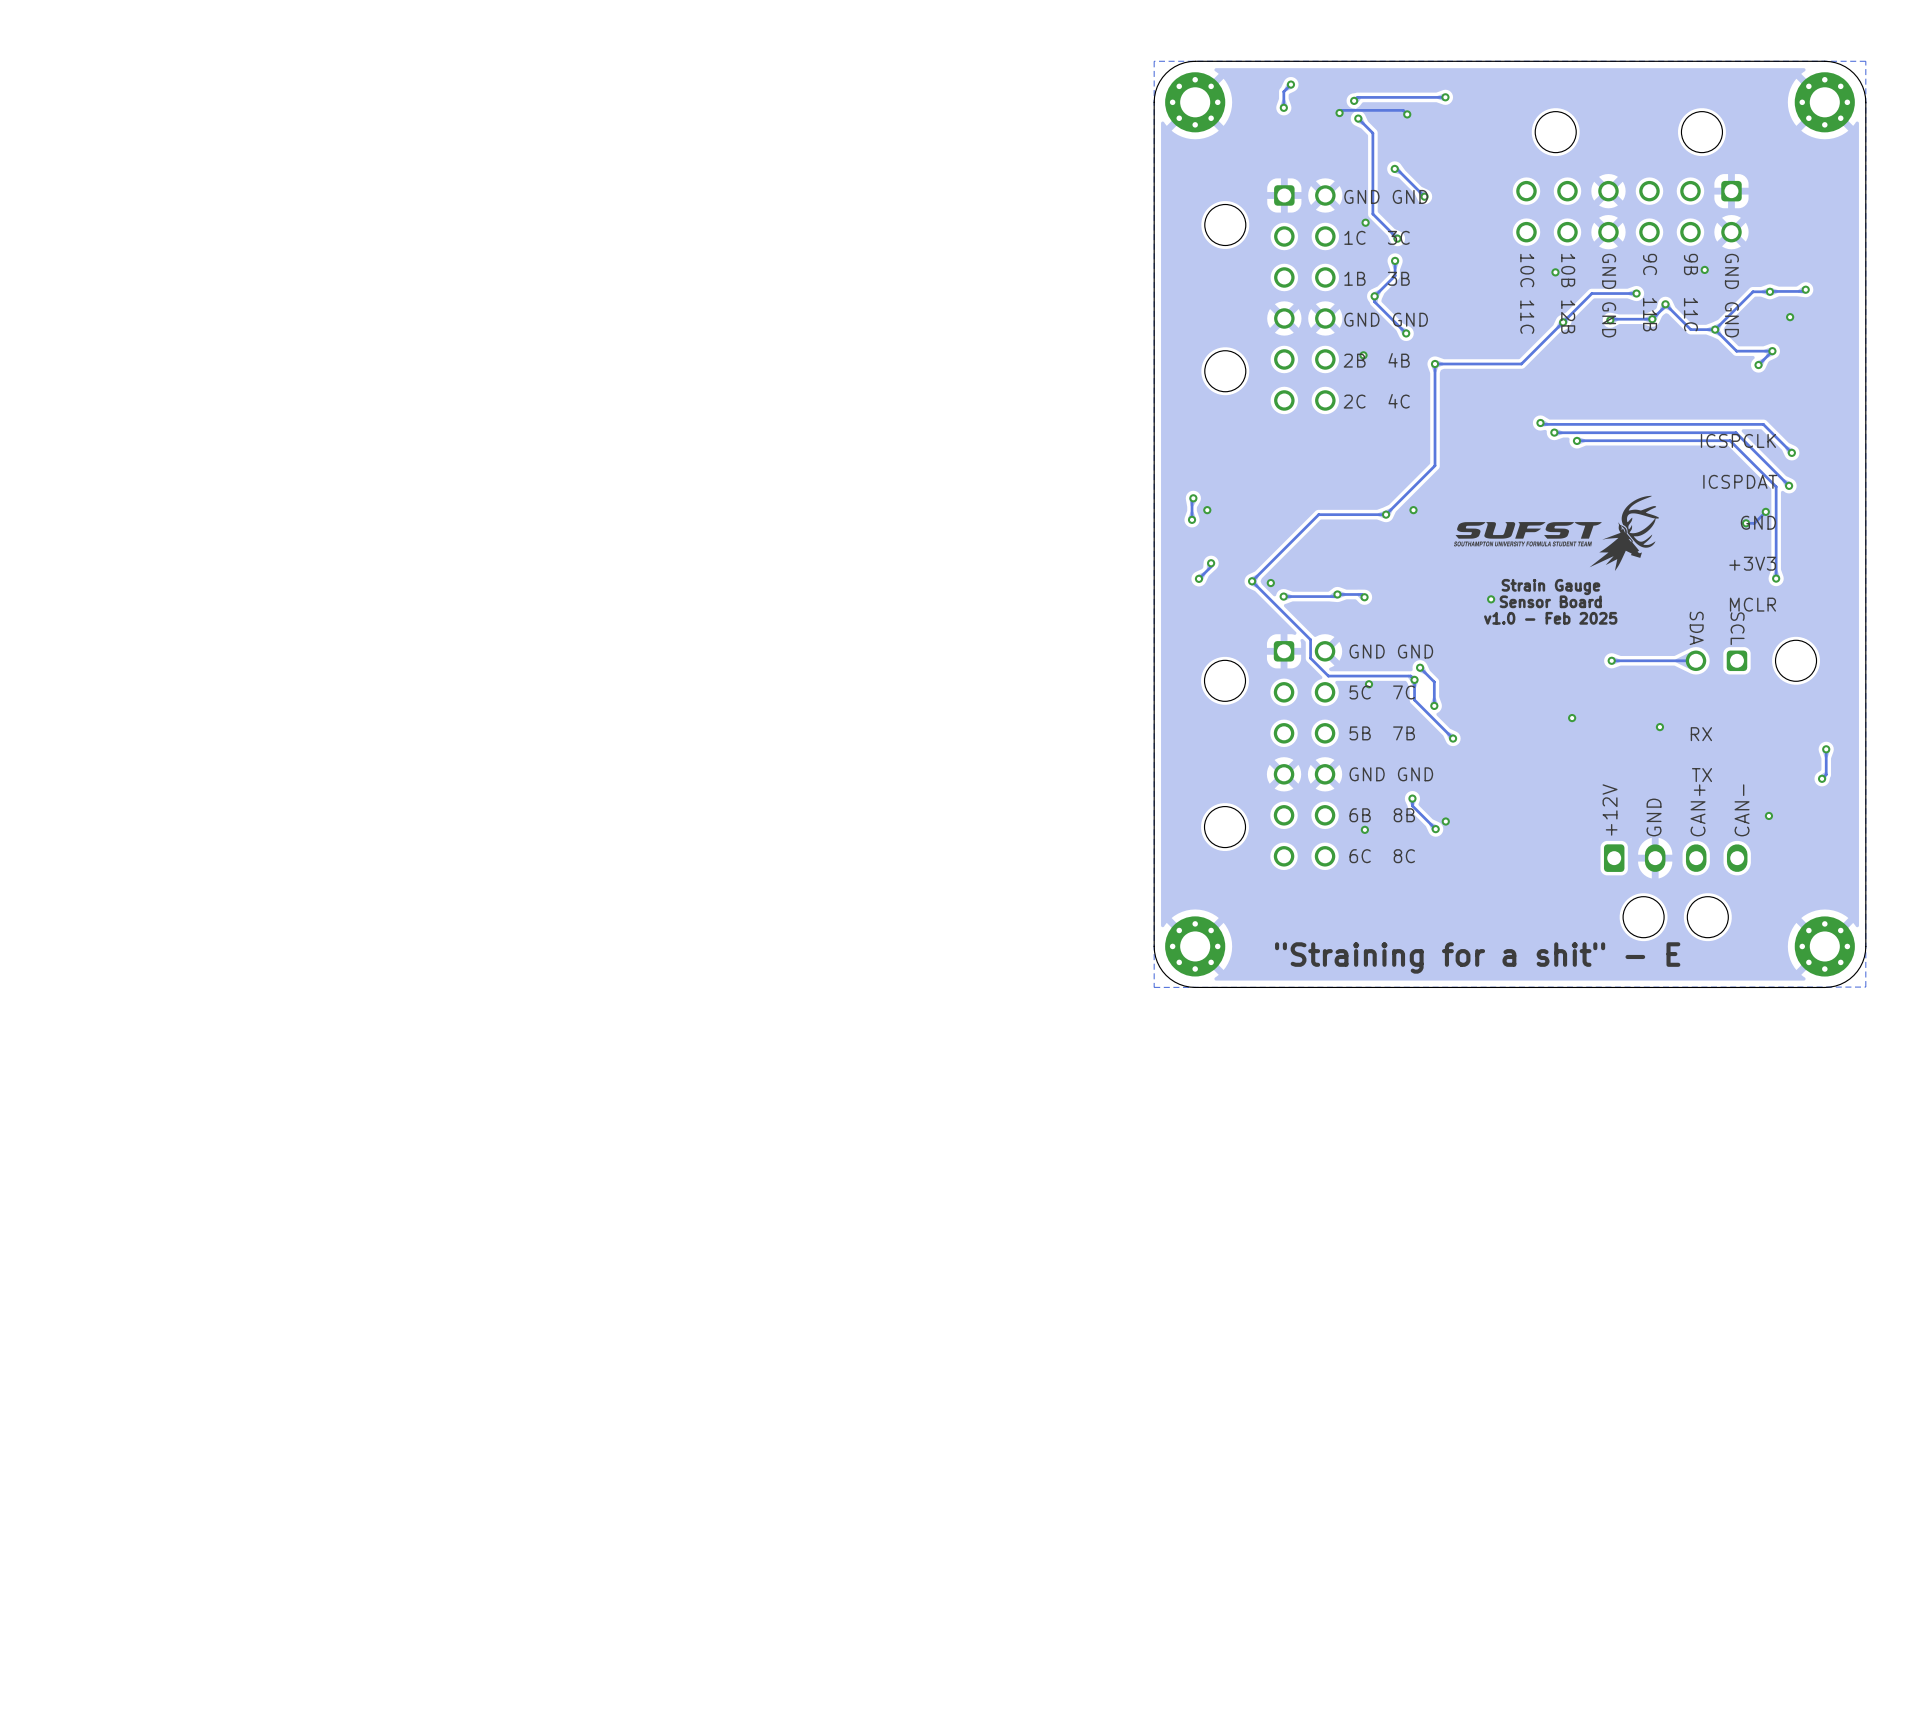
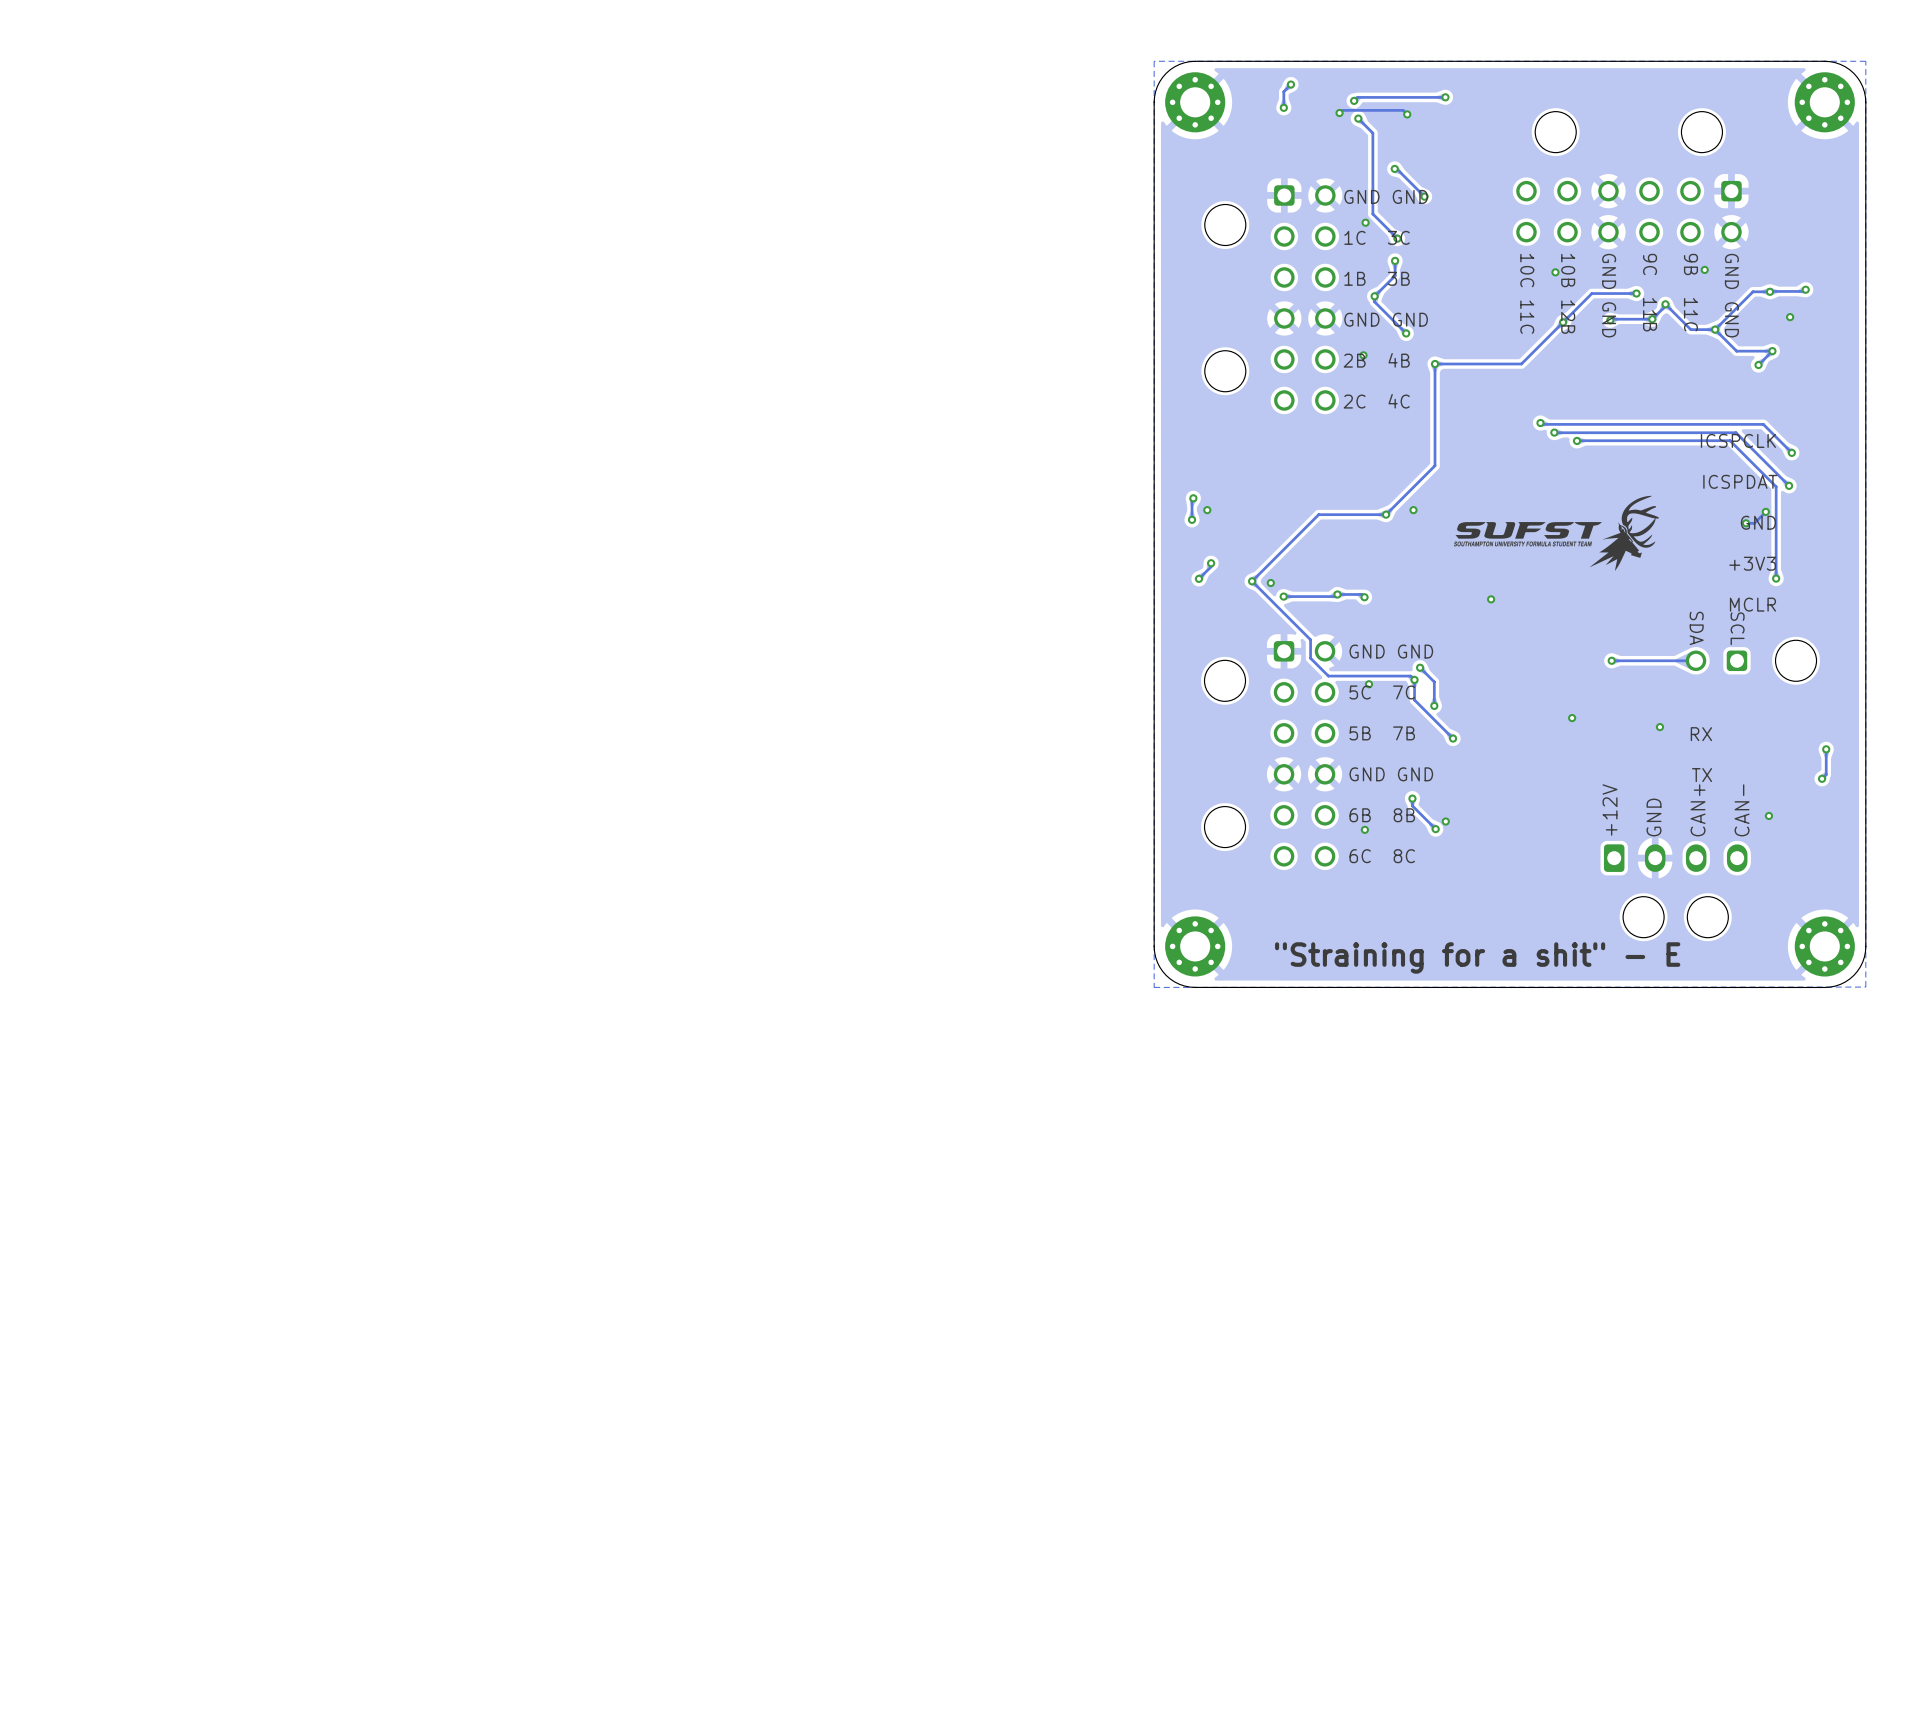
text: Strain Gauge (1550, 587) -> none
text: Sensor Board (1550, 601) -> none
text: v1.0 - Feb 2025 (1550, 618) -> none

